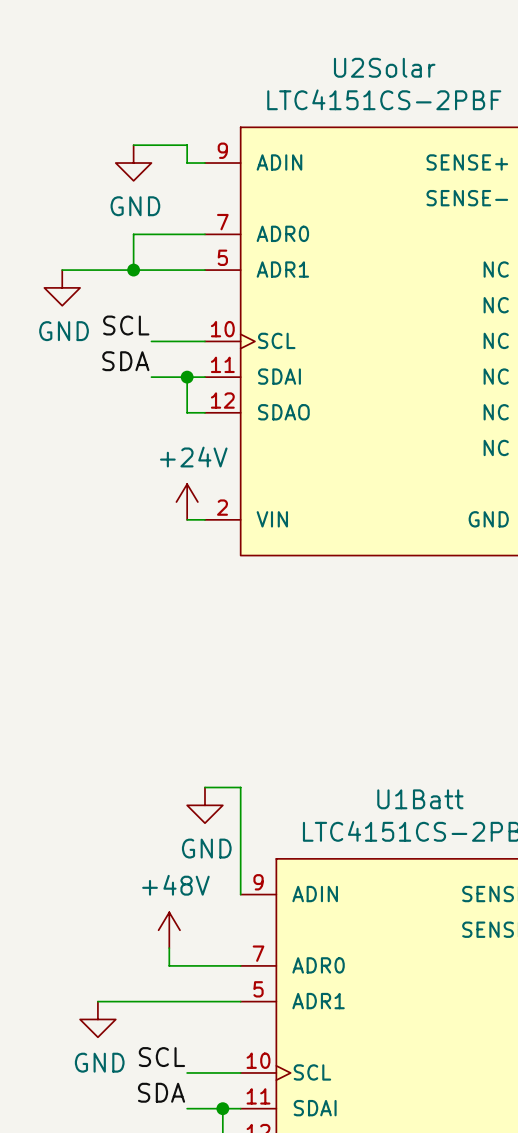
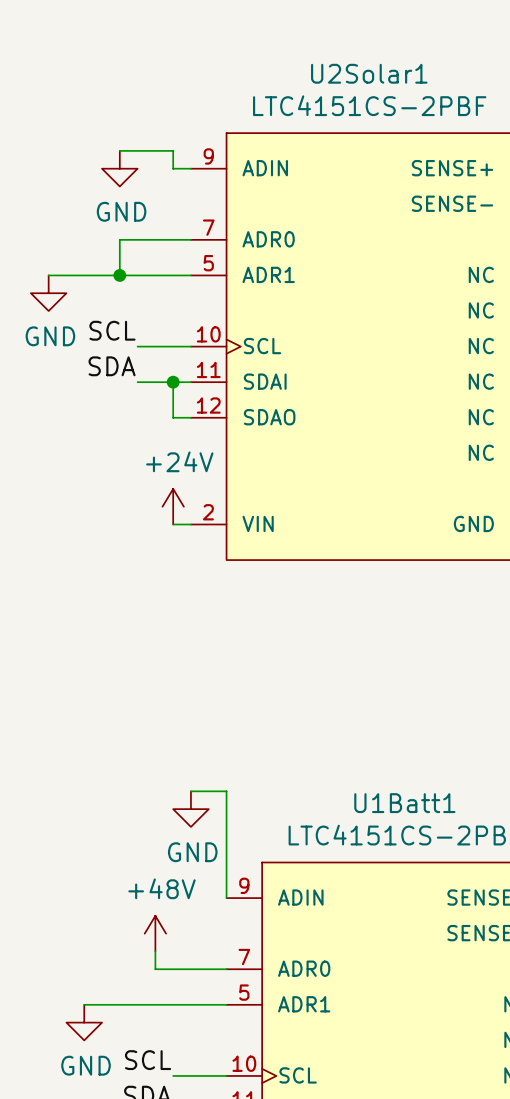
U2Solar name: U2Solar (384, 67) -> U2Solar1 (369, 73)
U1Batt name: U1Batt (420, 799) -> U1Batt1 (404, 803)

